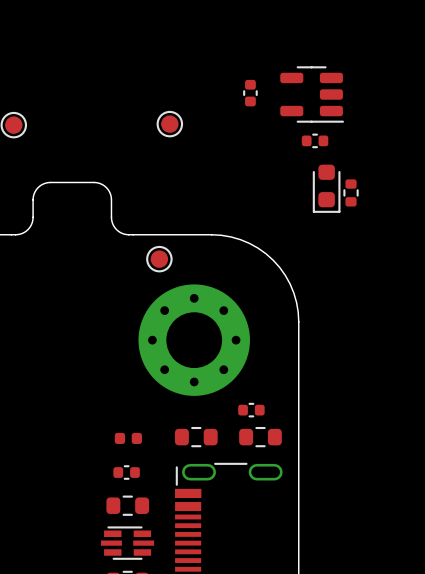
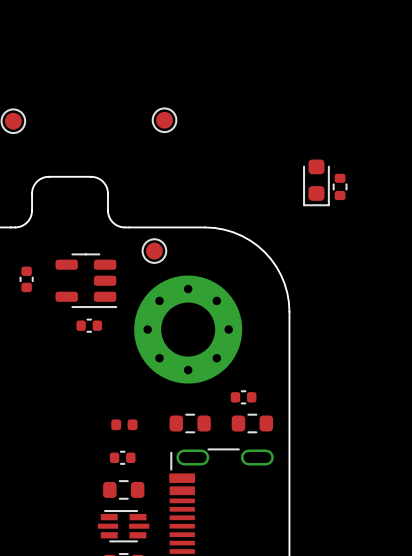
part: (250, 93) -> none
part position: (312, 94) -> (86, 280)
part: (315, 140) -> none
part: none -> (26, 279)
part: none -> (89, 325)

